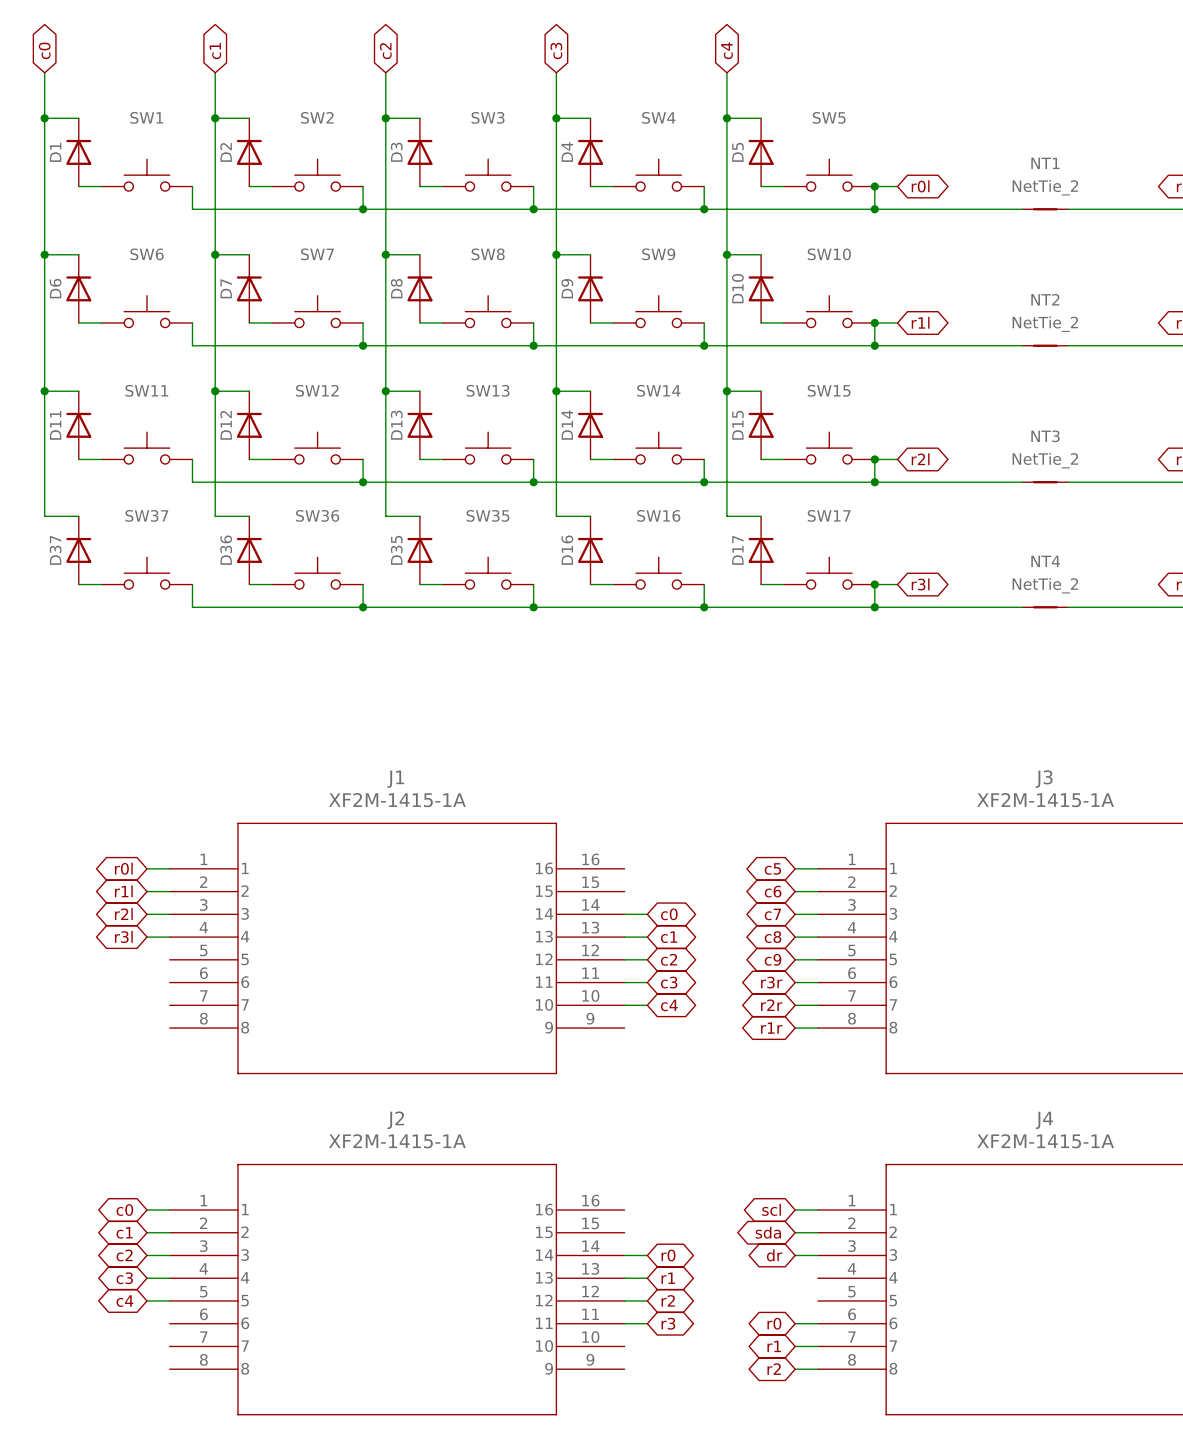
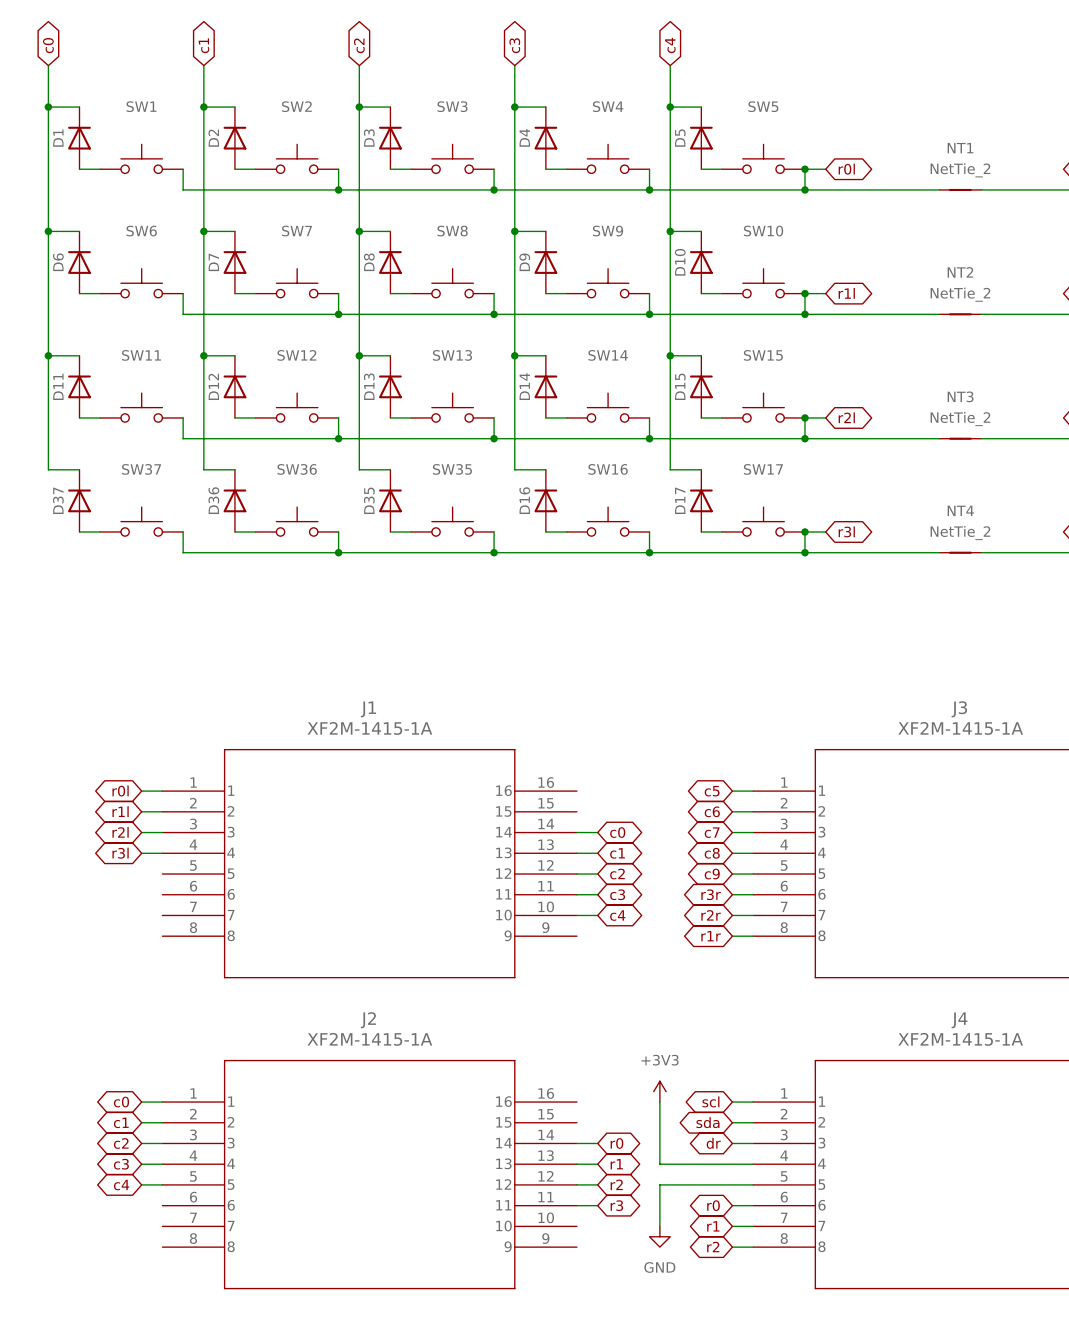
power symbol: none -> +3V3 (659, 1091)
wire: none -> (659, 1102) (659, 1164) (753, 1164)
wire: none -> (753, 1184) (659, 1184) (659, 1226)
power symbol: none -> GND (659, 1236)

